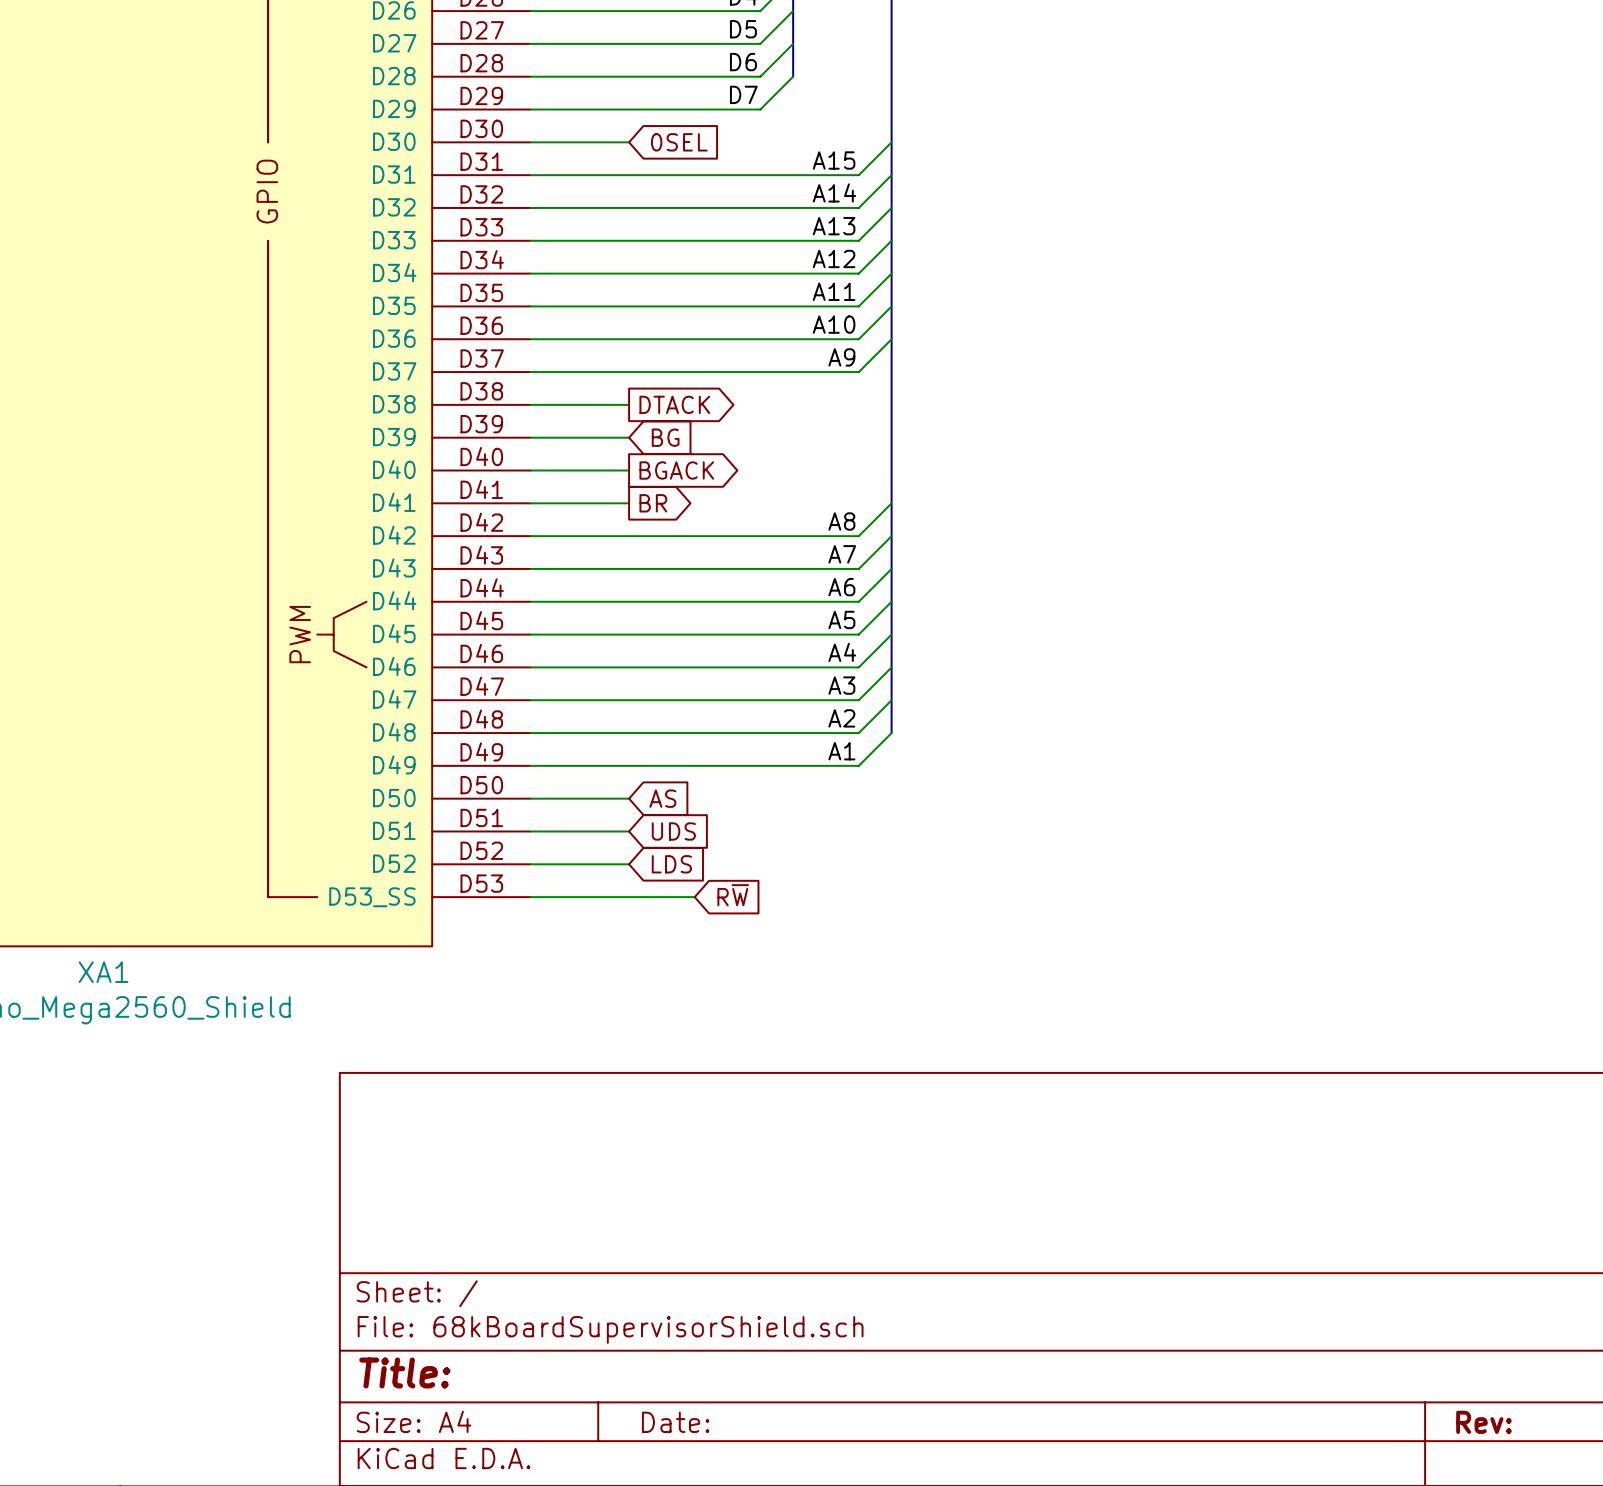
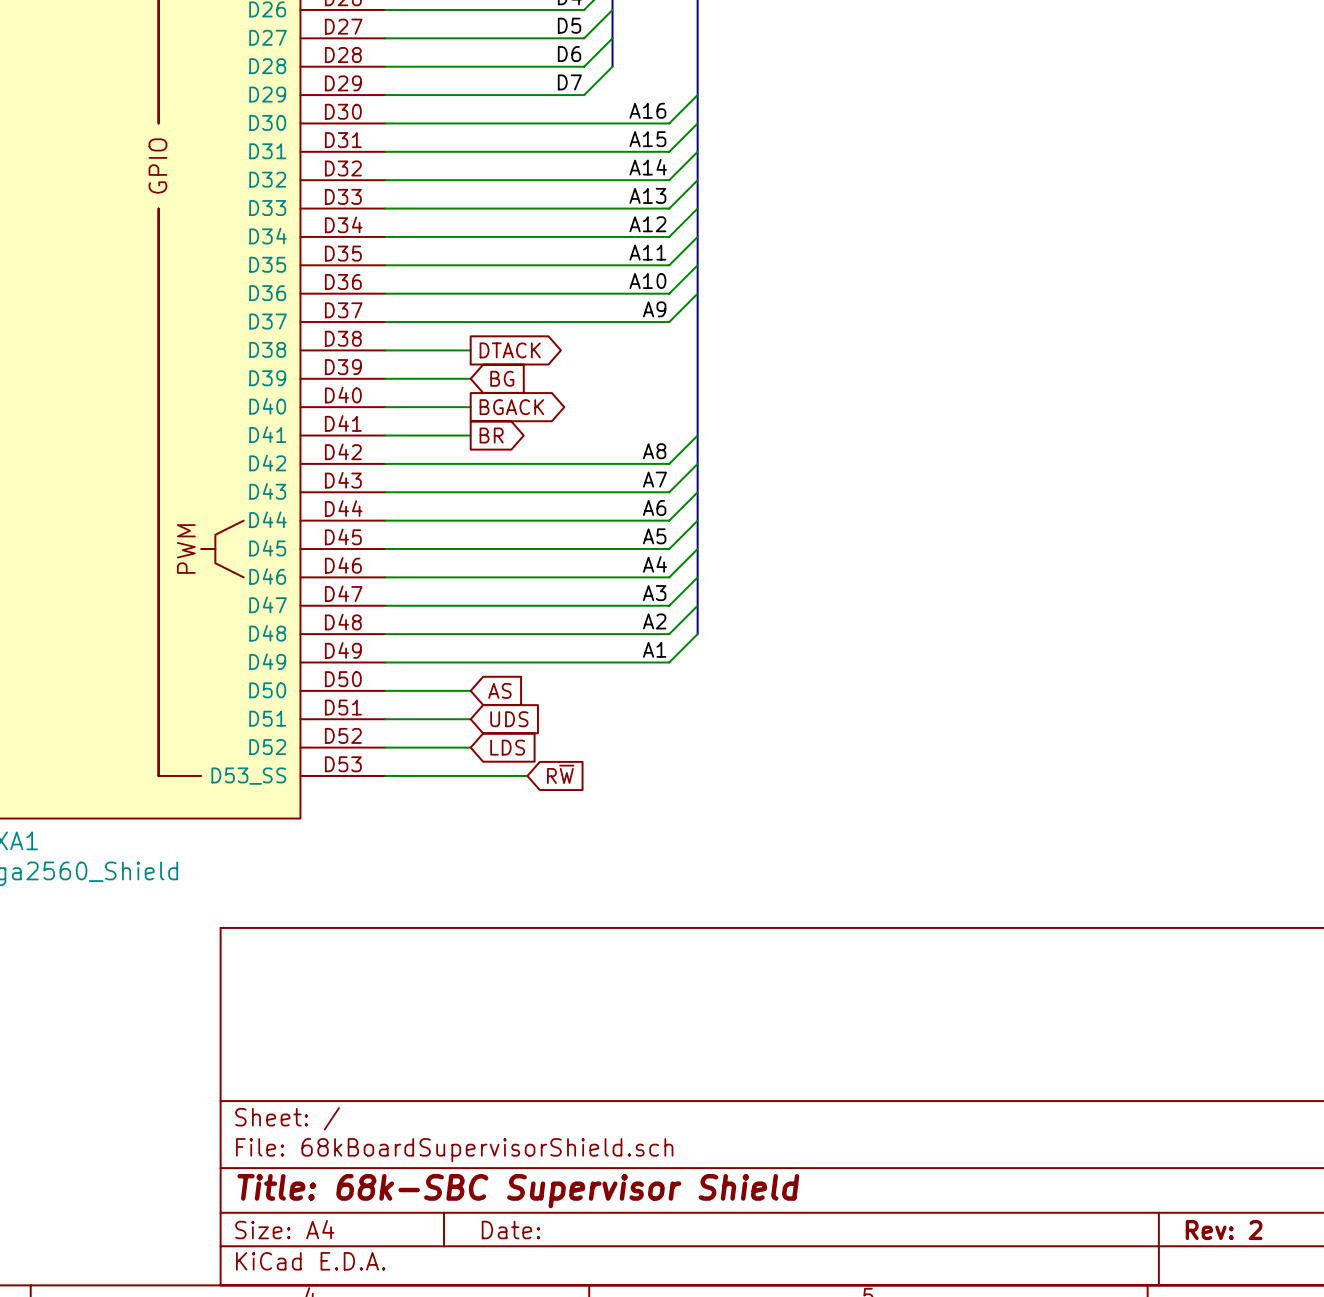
wire: none -> (697, 95) (669, 123) (470, 123)
label: none -> A16 (647, 110)
global label: 0SEL (679, 142) -> none
title block: Title: (404, 1372) -> Title: 68k-SBC Supervisor Shield (518, 1191)
title block: Rev: (1483, 1422) -> Rev: 2 (1224, 1230)

